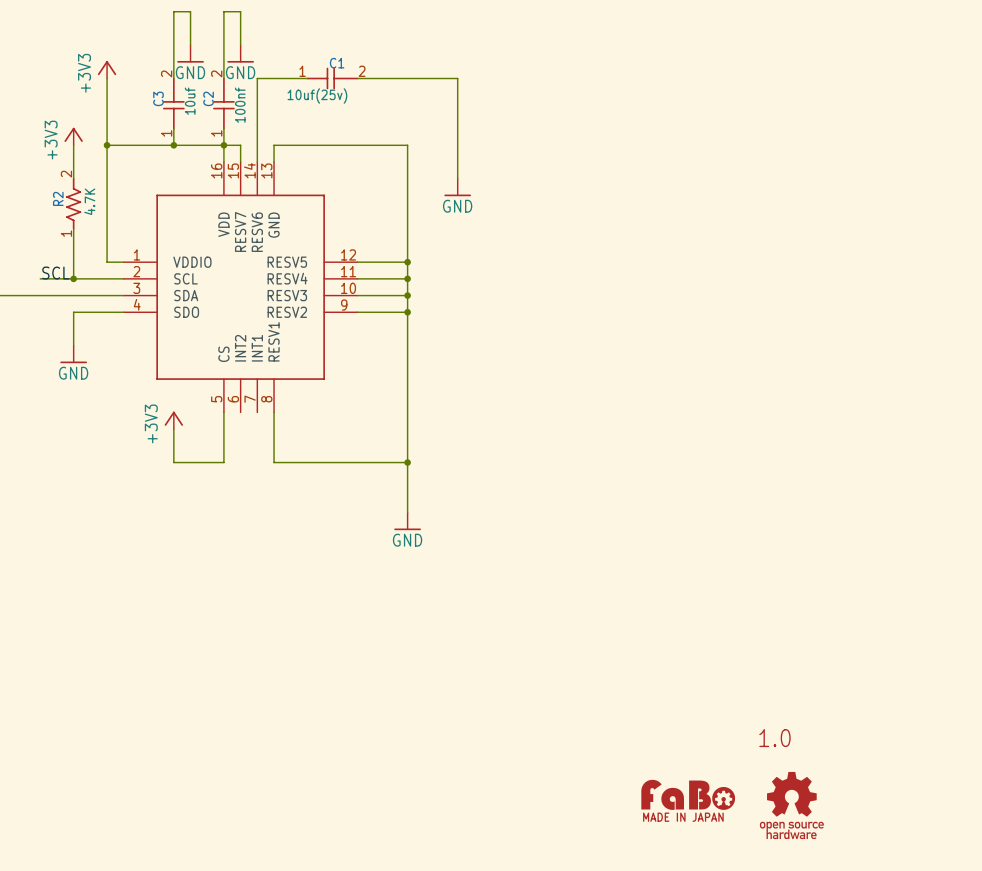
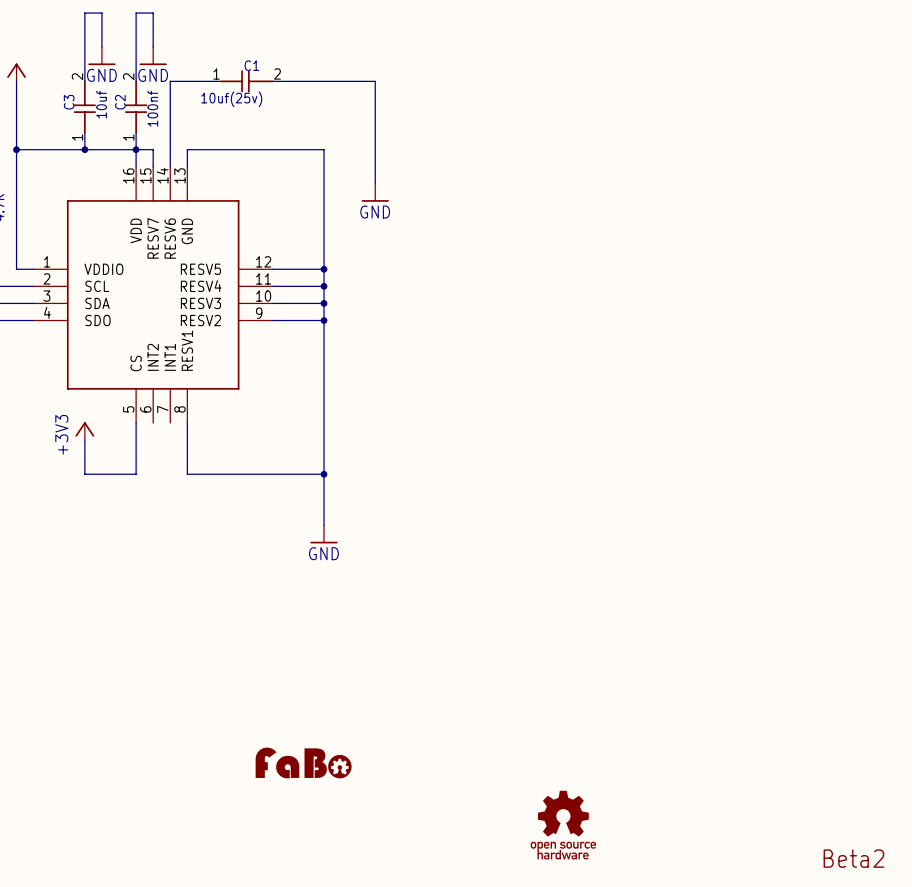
text: 1.0 (774, 738) -> none
part: none -> (303, 762)
part: (688, 794) -> none
part position: (791, 805) -> (563, 825)
text: none -> Beta2 (853, 858)

